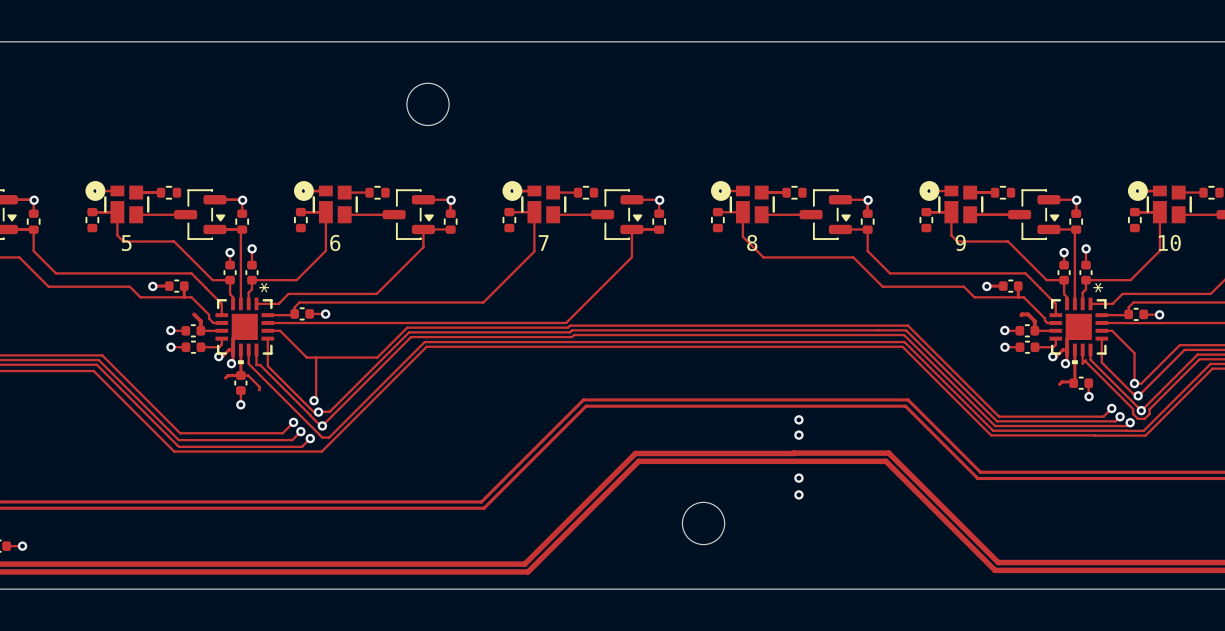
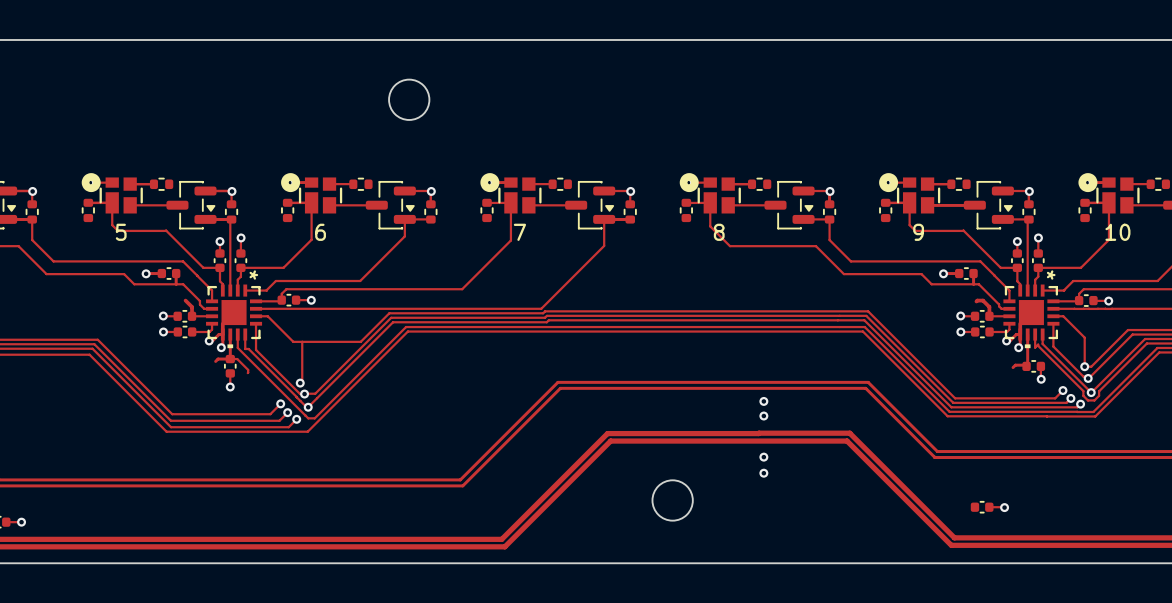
part: none -> (982, 507)
track: none -> (989, 507) (1004, 507)
via: none -> (1004, 507)

